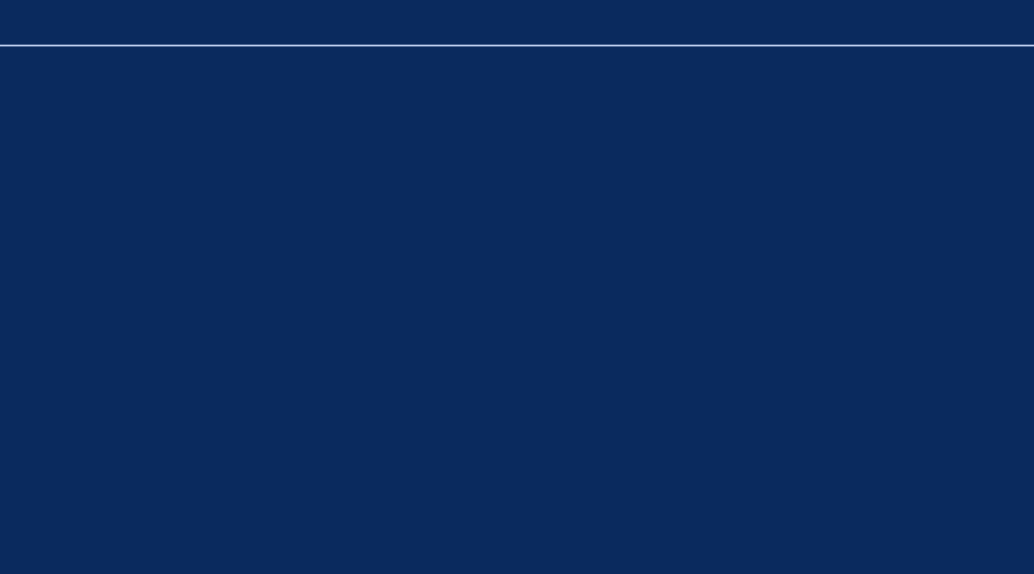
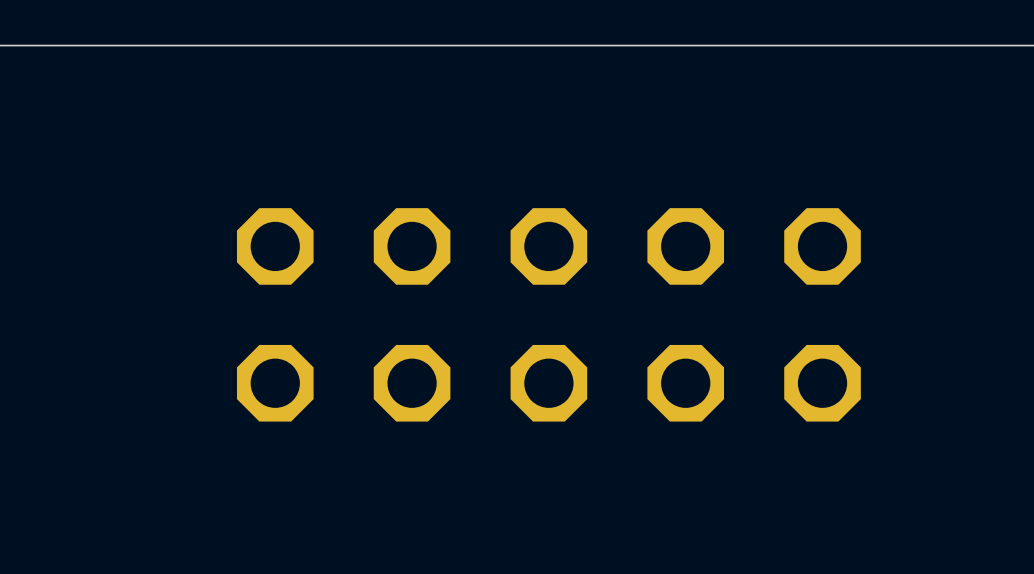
part: none -> (548, 314)

